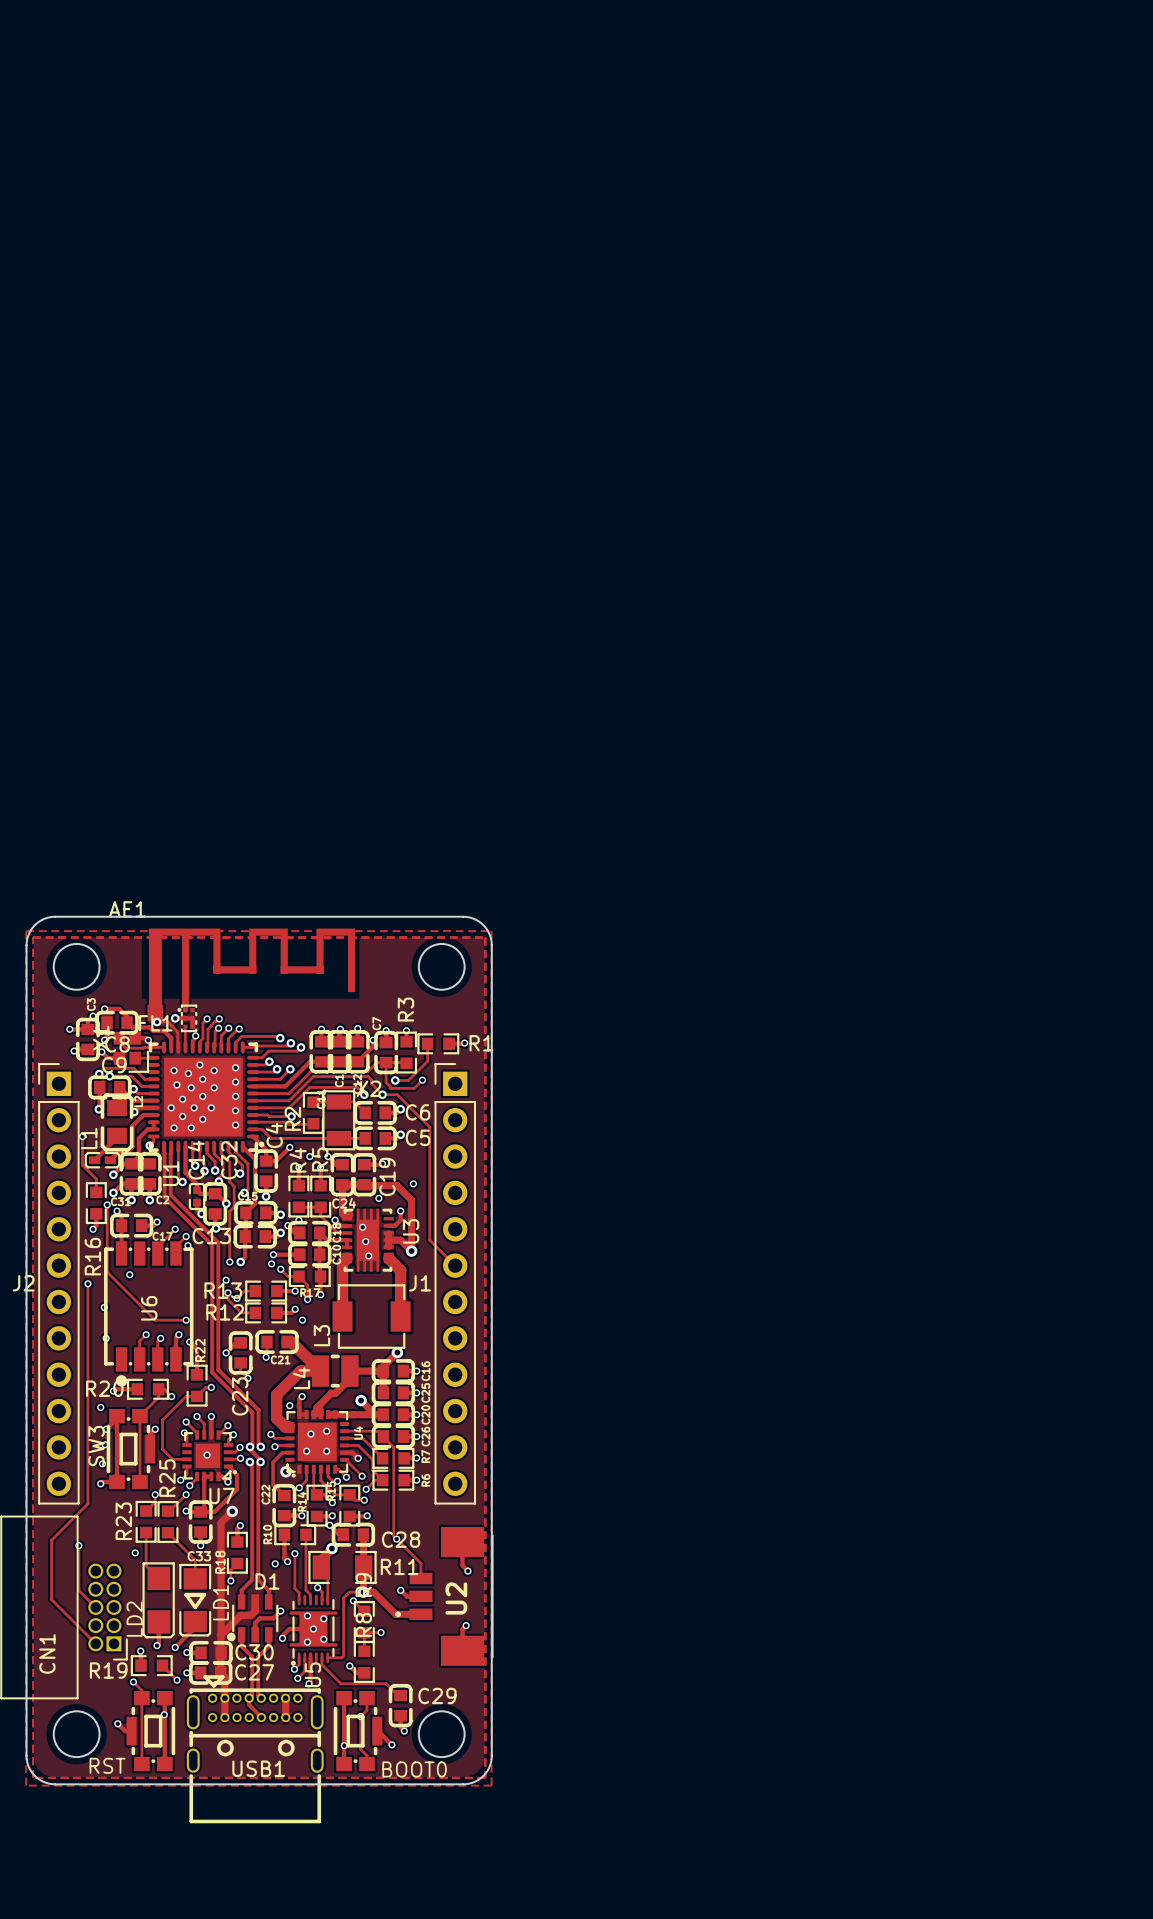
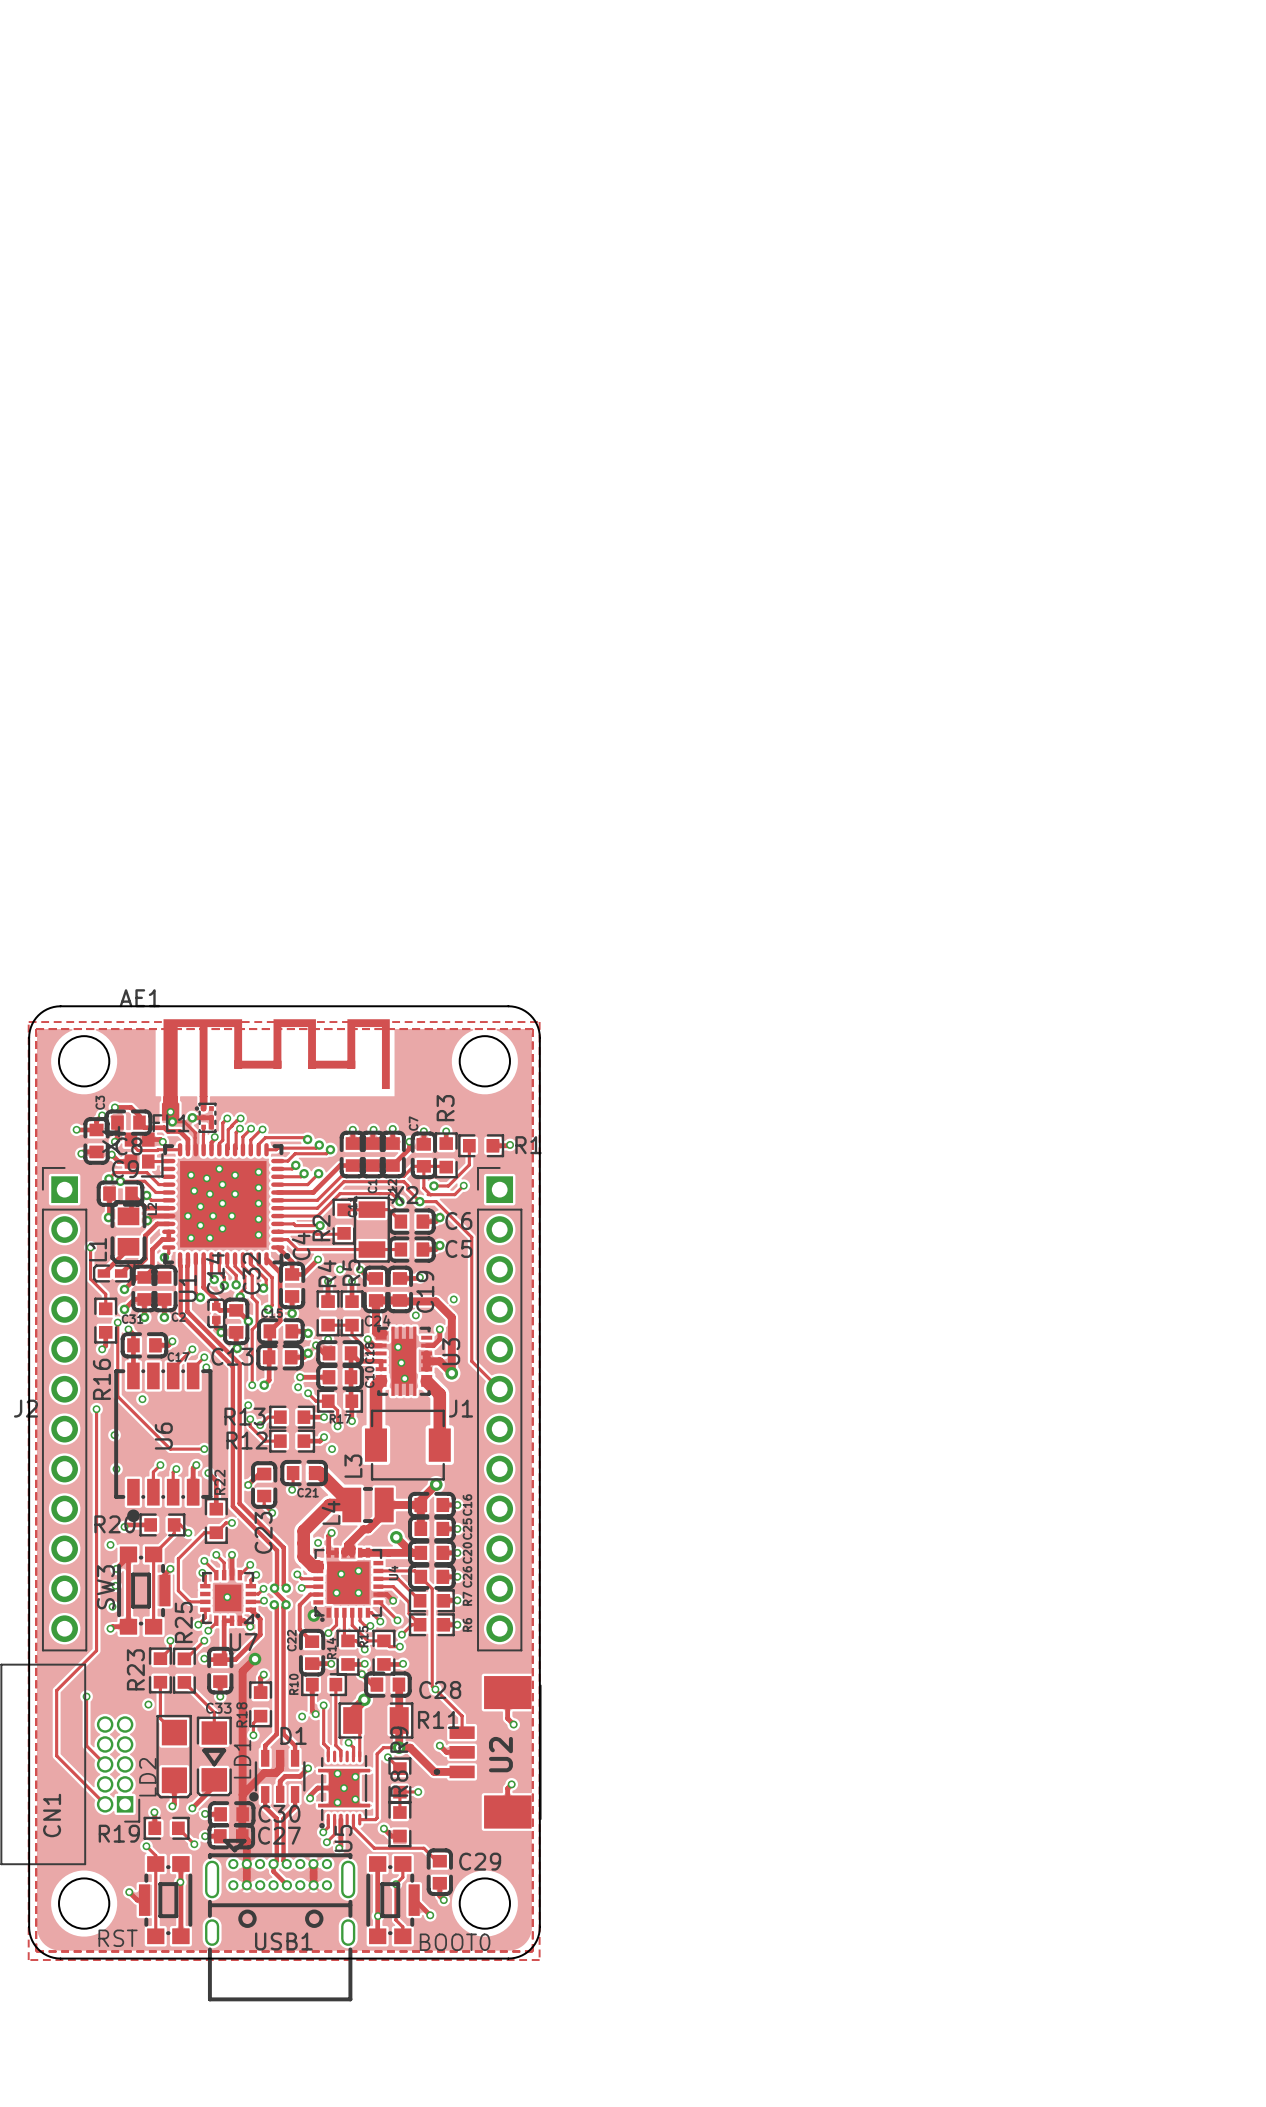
via: none -> (170, 1111)

